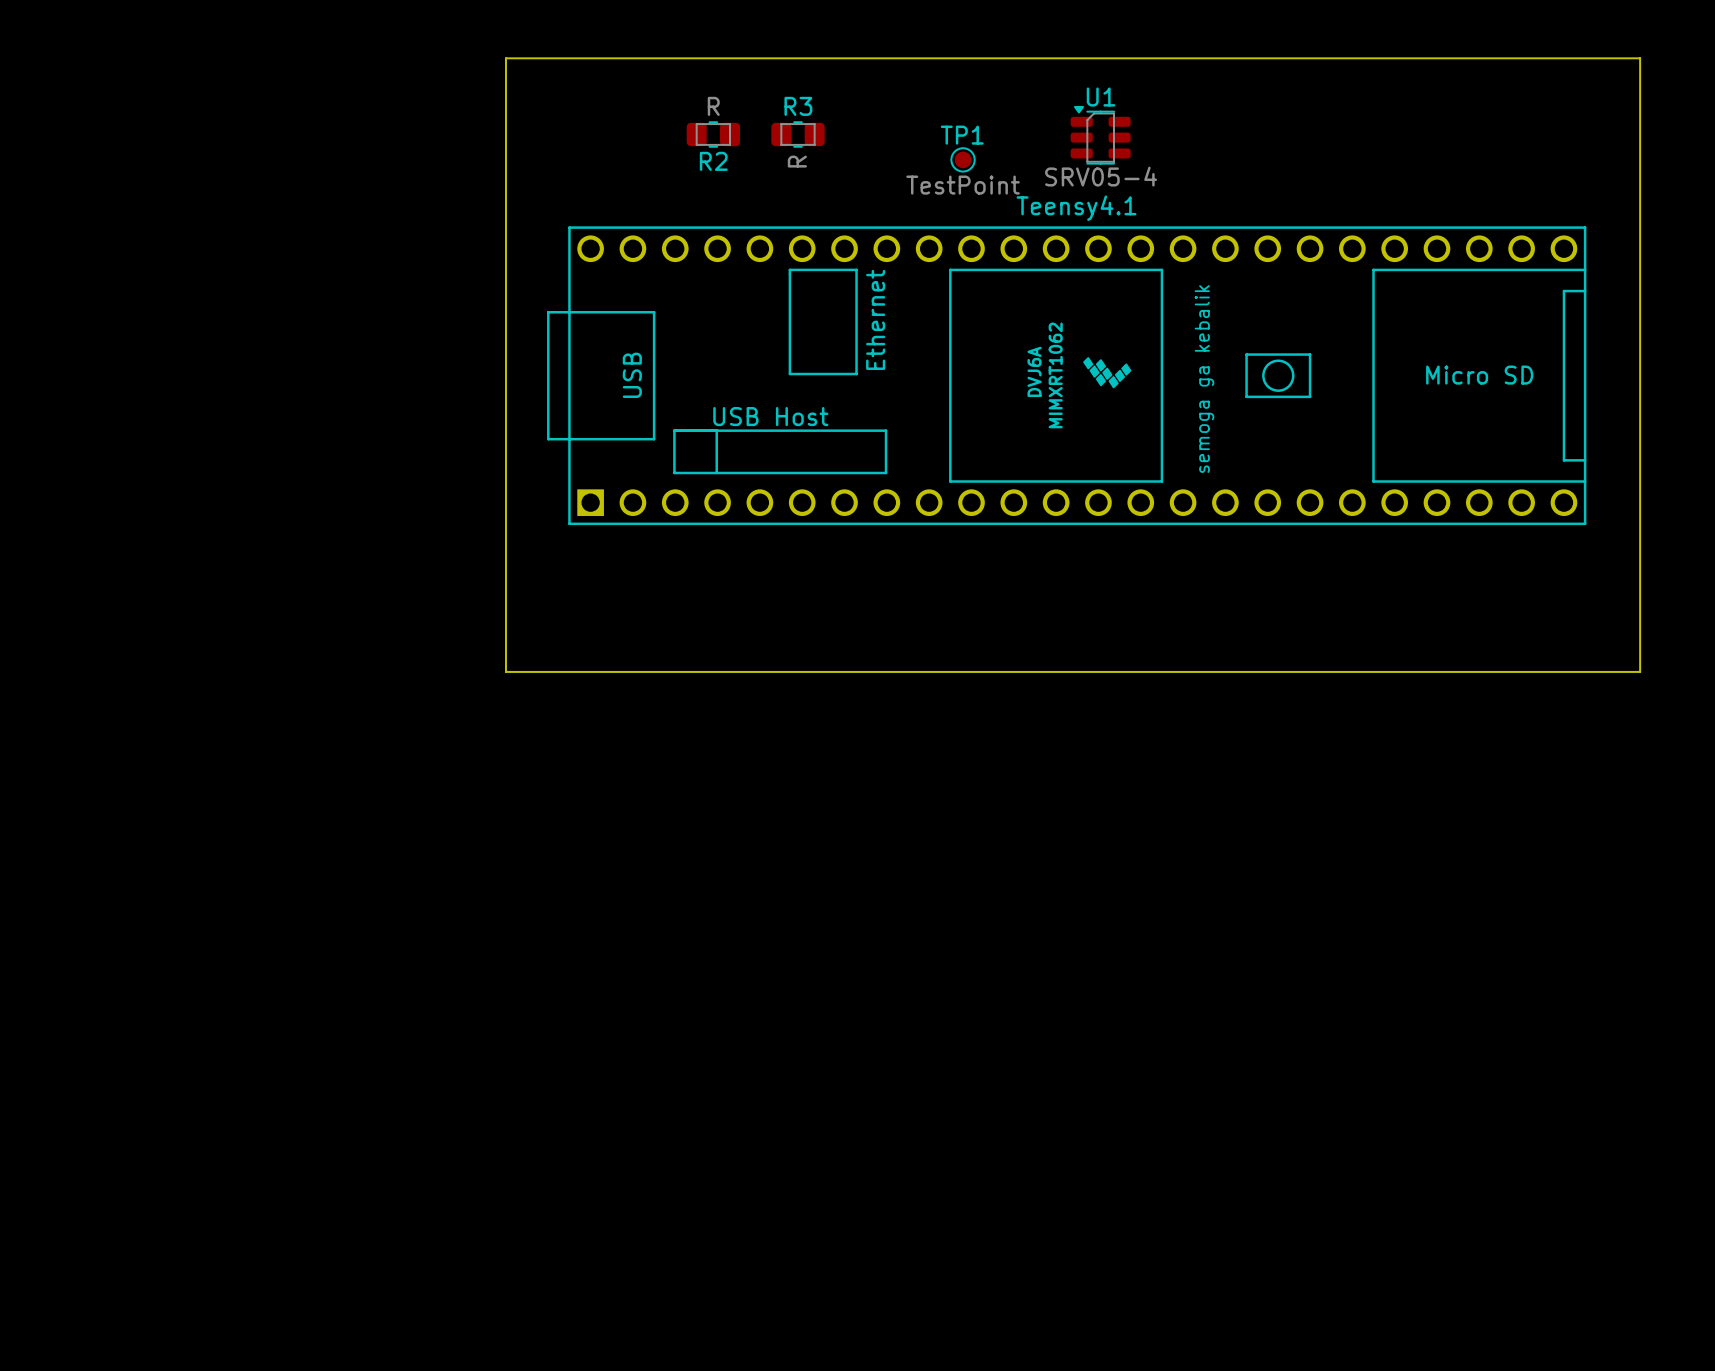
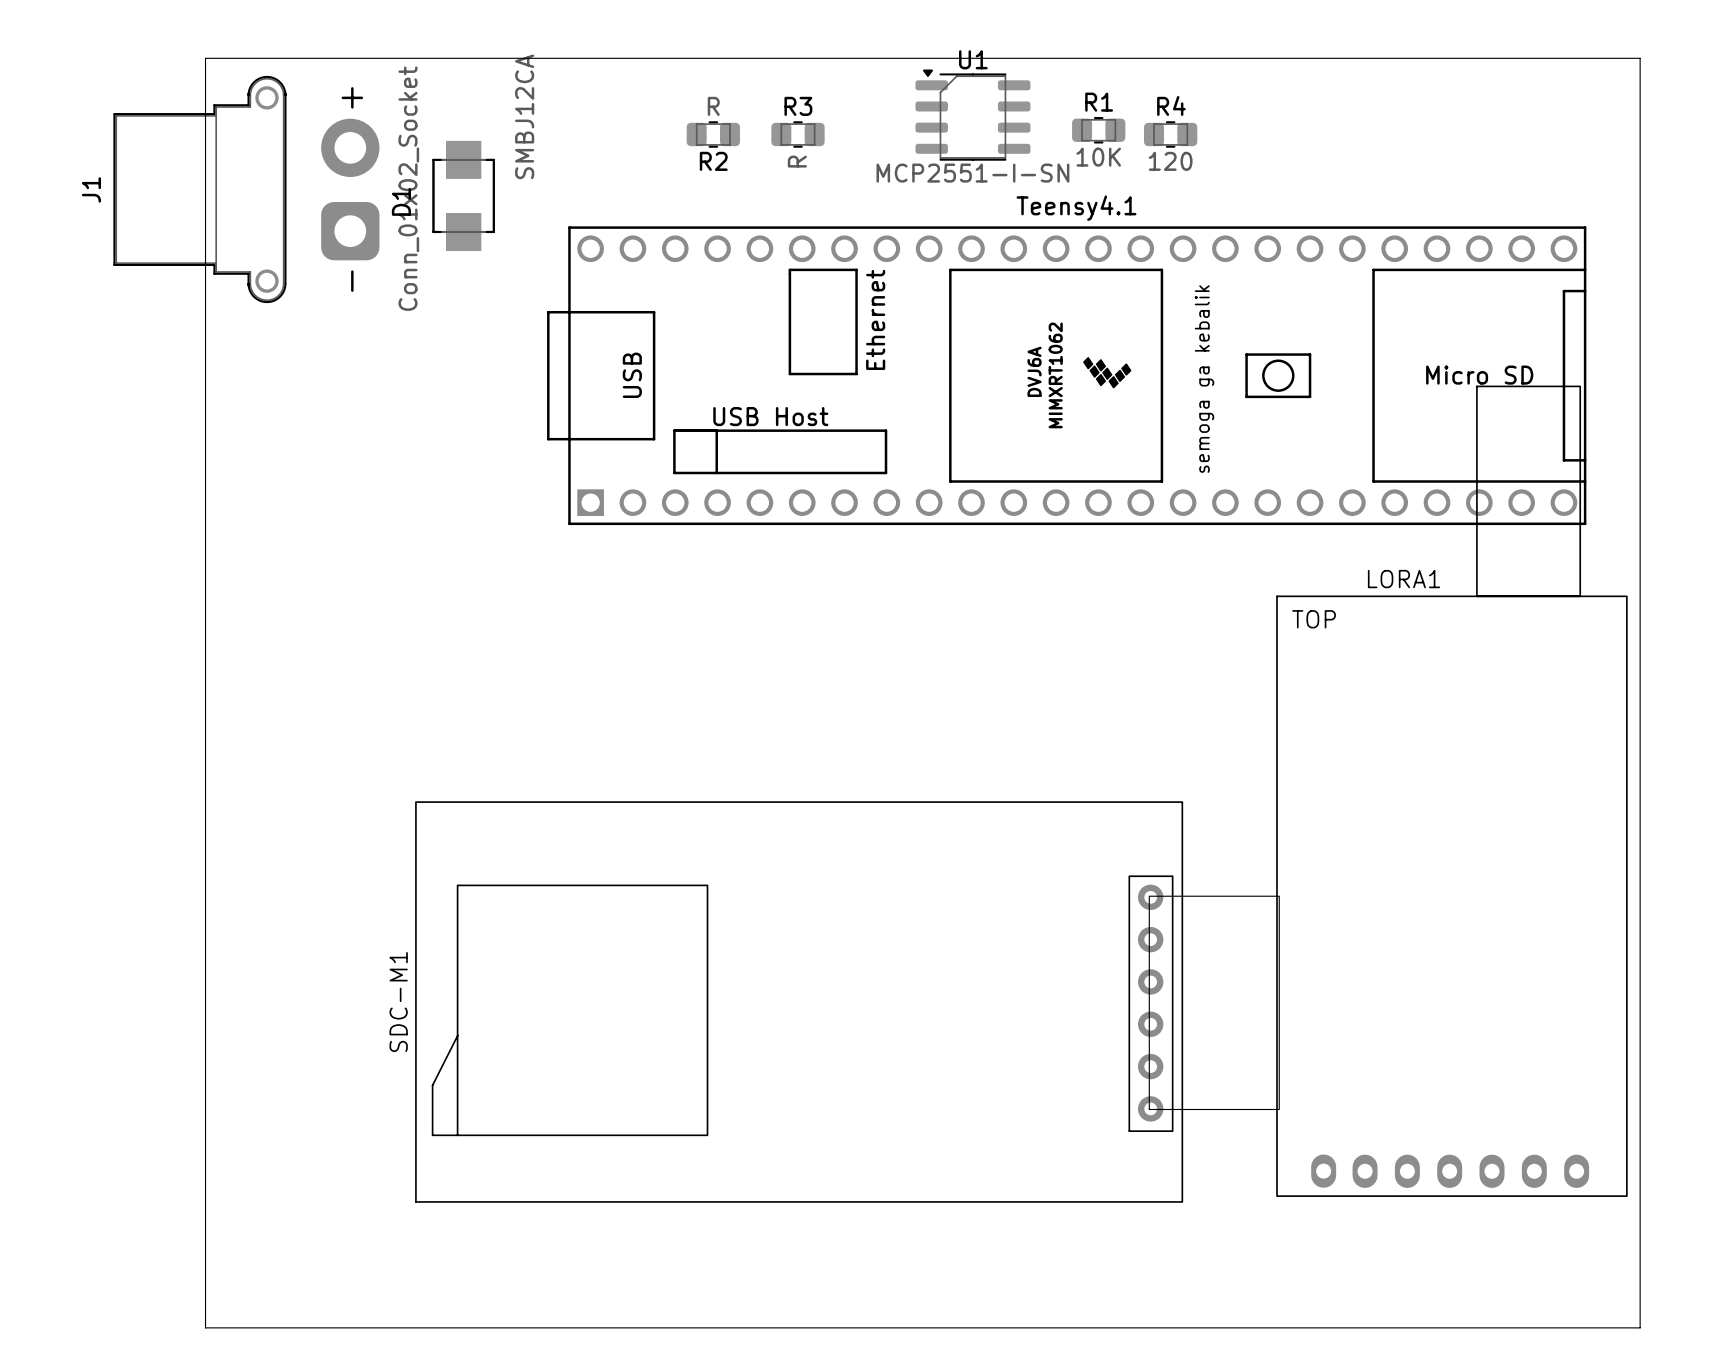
board edge: (505, 58) (505, 671) (1640, 671) -> (505, 58) (205, 58) (205, 1327) (1640, 1327) (1640, 671)
U1 footprint: [1070, 105, 1131, 165] -> [915, 69, 1031, 161]
R1: none -> 10K (1098, 130)
R4: none -> 120 (1170, 134)
TP1: TestPoint (963, 159) -> none
U1 value: SRV05-4 (1101, 176) -> MCP2551-I-SN (972, 173)
J1: none -> Conn_01x02_Socket (246, 189)
D1: none -> SMBJ12CA (463, 195)
LORA1: none -> (1451, 791)
SDC-M1: none -> (847, 1002)

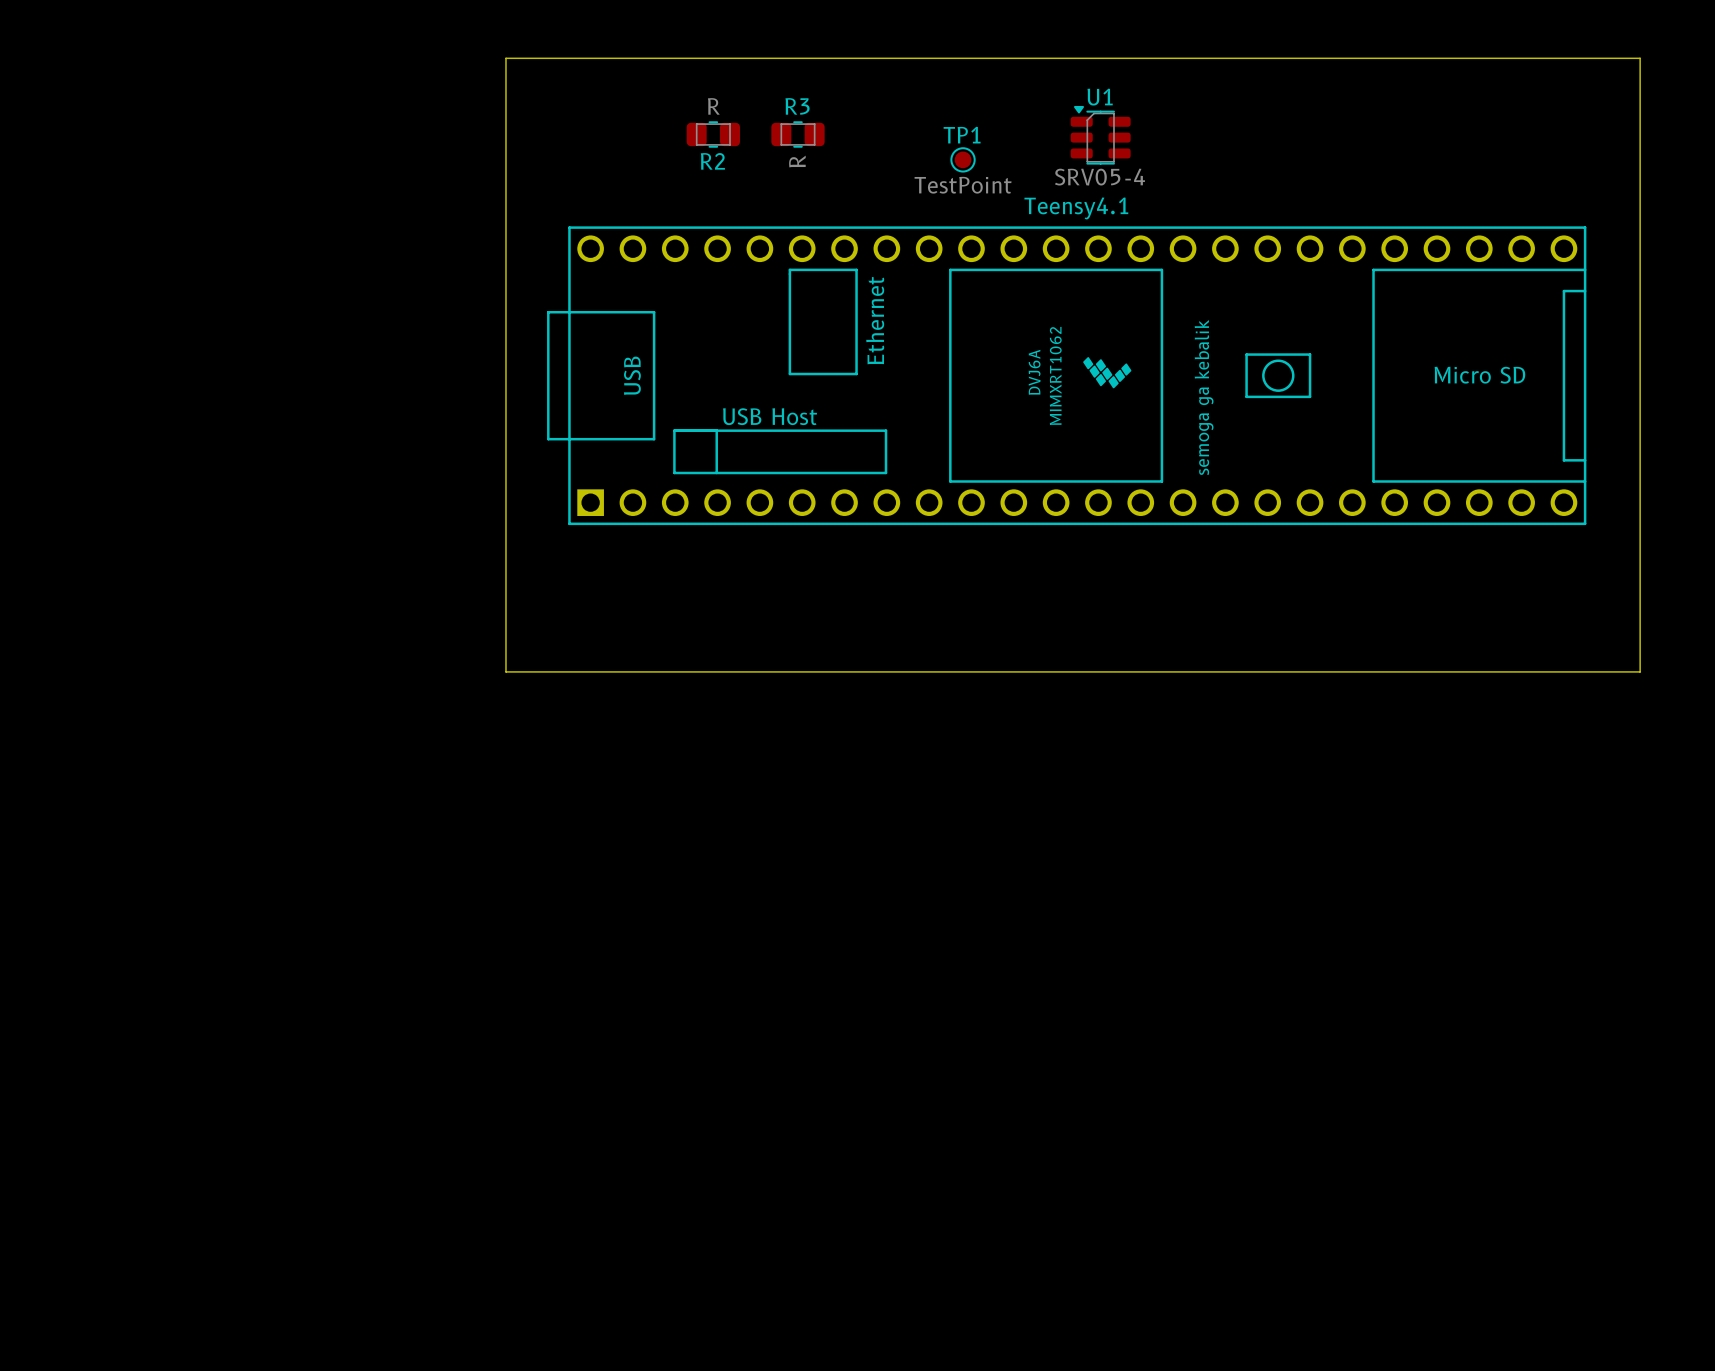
board edge: (505, 58) (205, 58) (205, 1327) (1640, 1327) (1640, 671) -> (505, 58) (505, 671) (1640, 671)
U1 footprint: [915, 69, 1031, 161] -> [1070, 105, 1131, 165]
R1: 10K (1098, 130) -> none
R4: 120 (1170, 134) -> none
TP1: none -> TestPoint (963, 159)
U1 value: MCP2551-I-SN (972, 173) -> SRV05-4 (1100, 177)
J1: Conn_01x02_Socket (246, 189) -> none
D1: SMBJ12CA (463, 195) -> none
LORA1: (1451, 791) -> none
SDC-M1: (847, 1002) -> none

